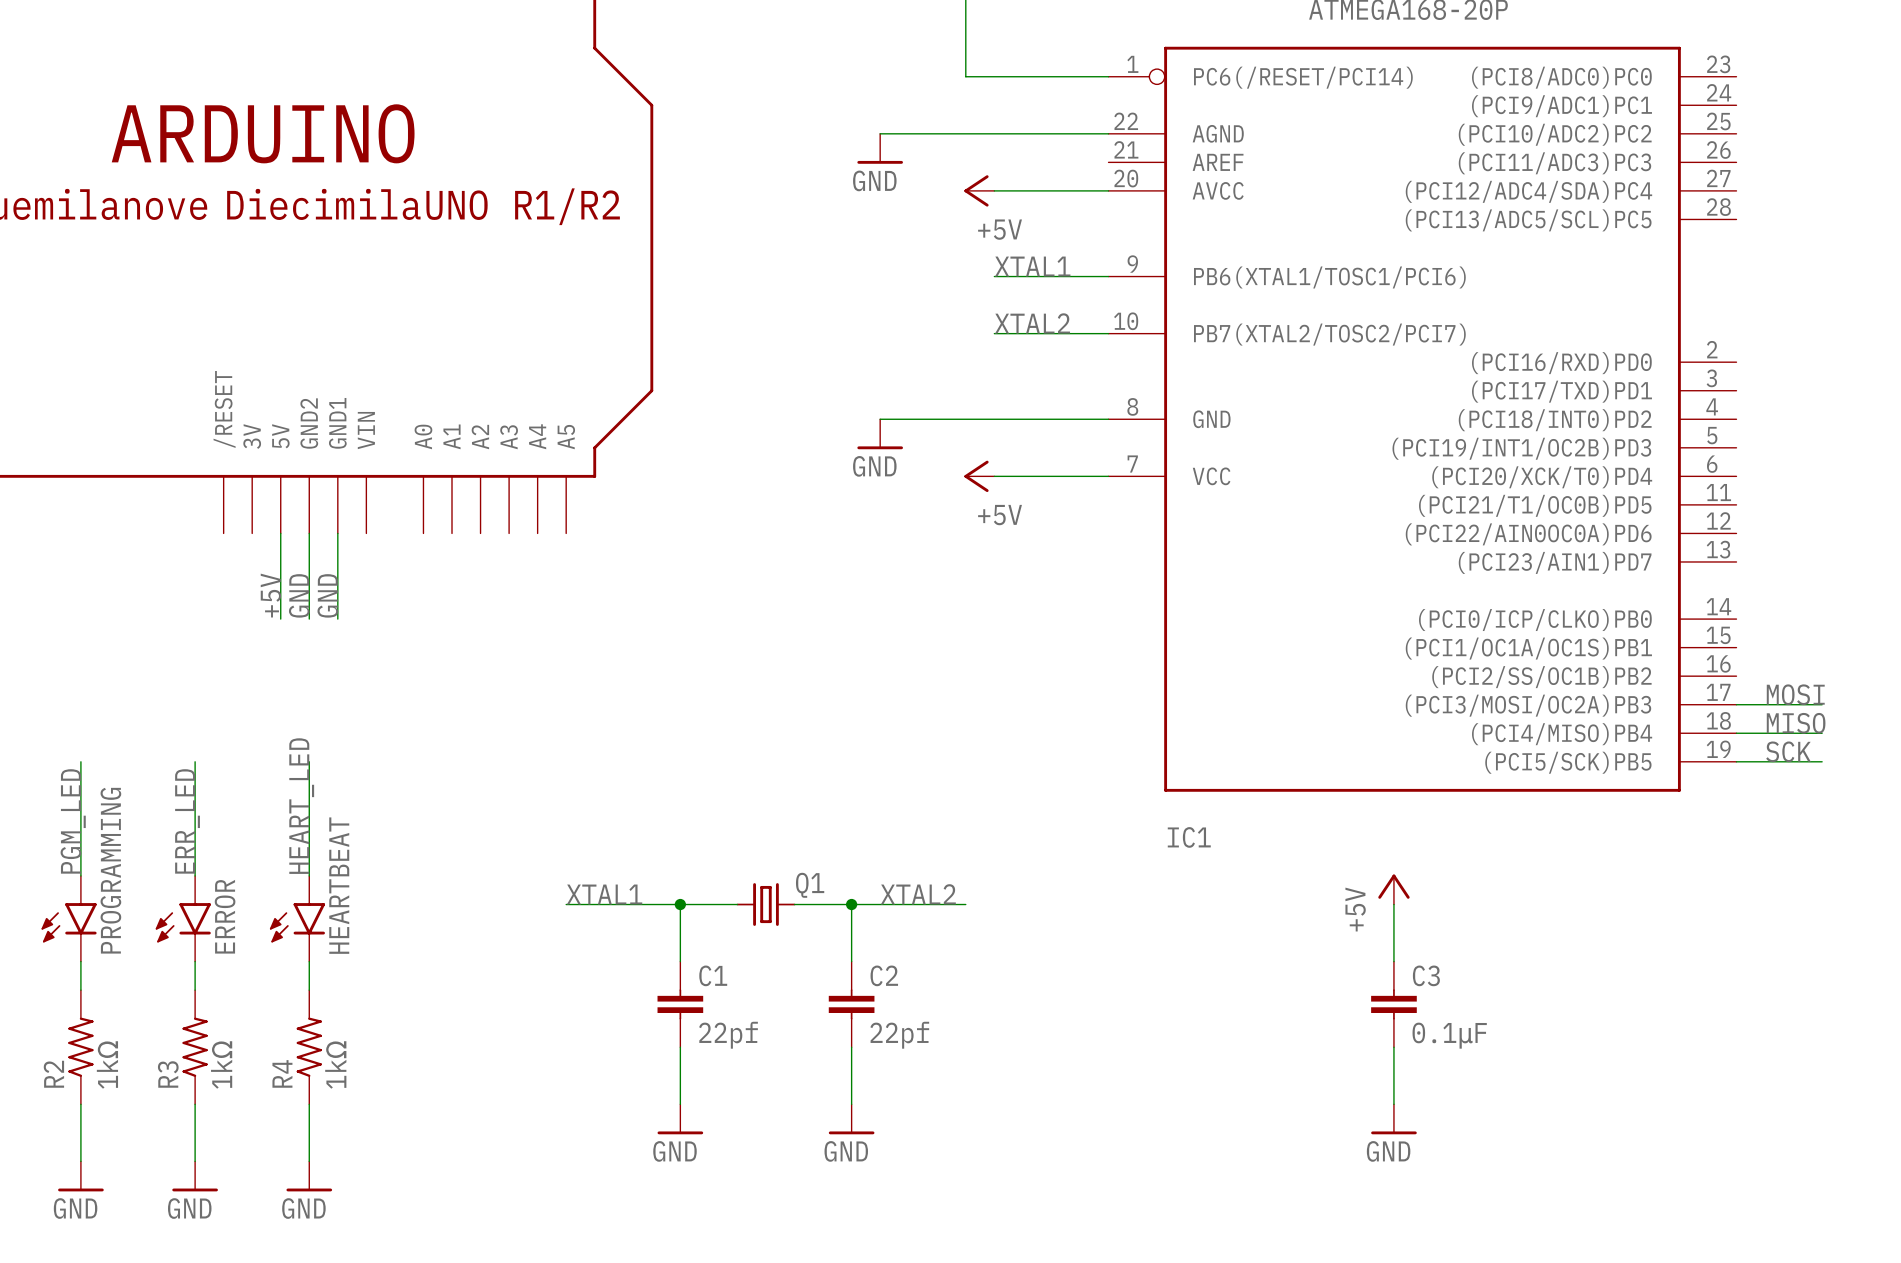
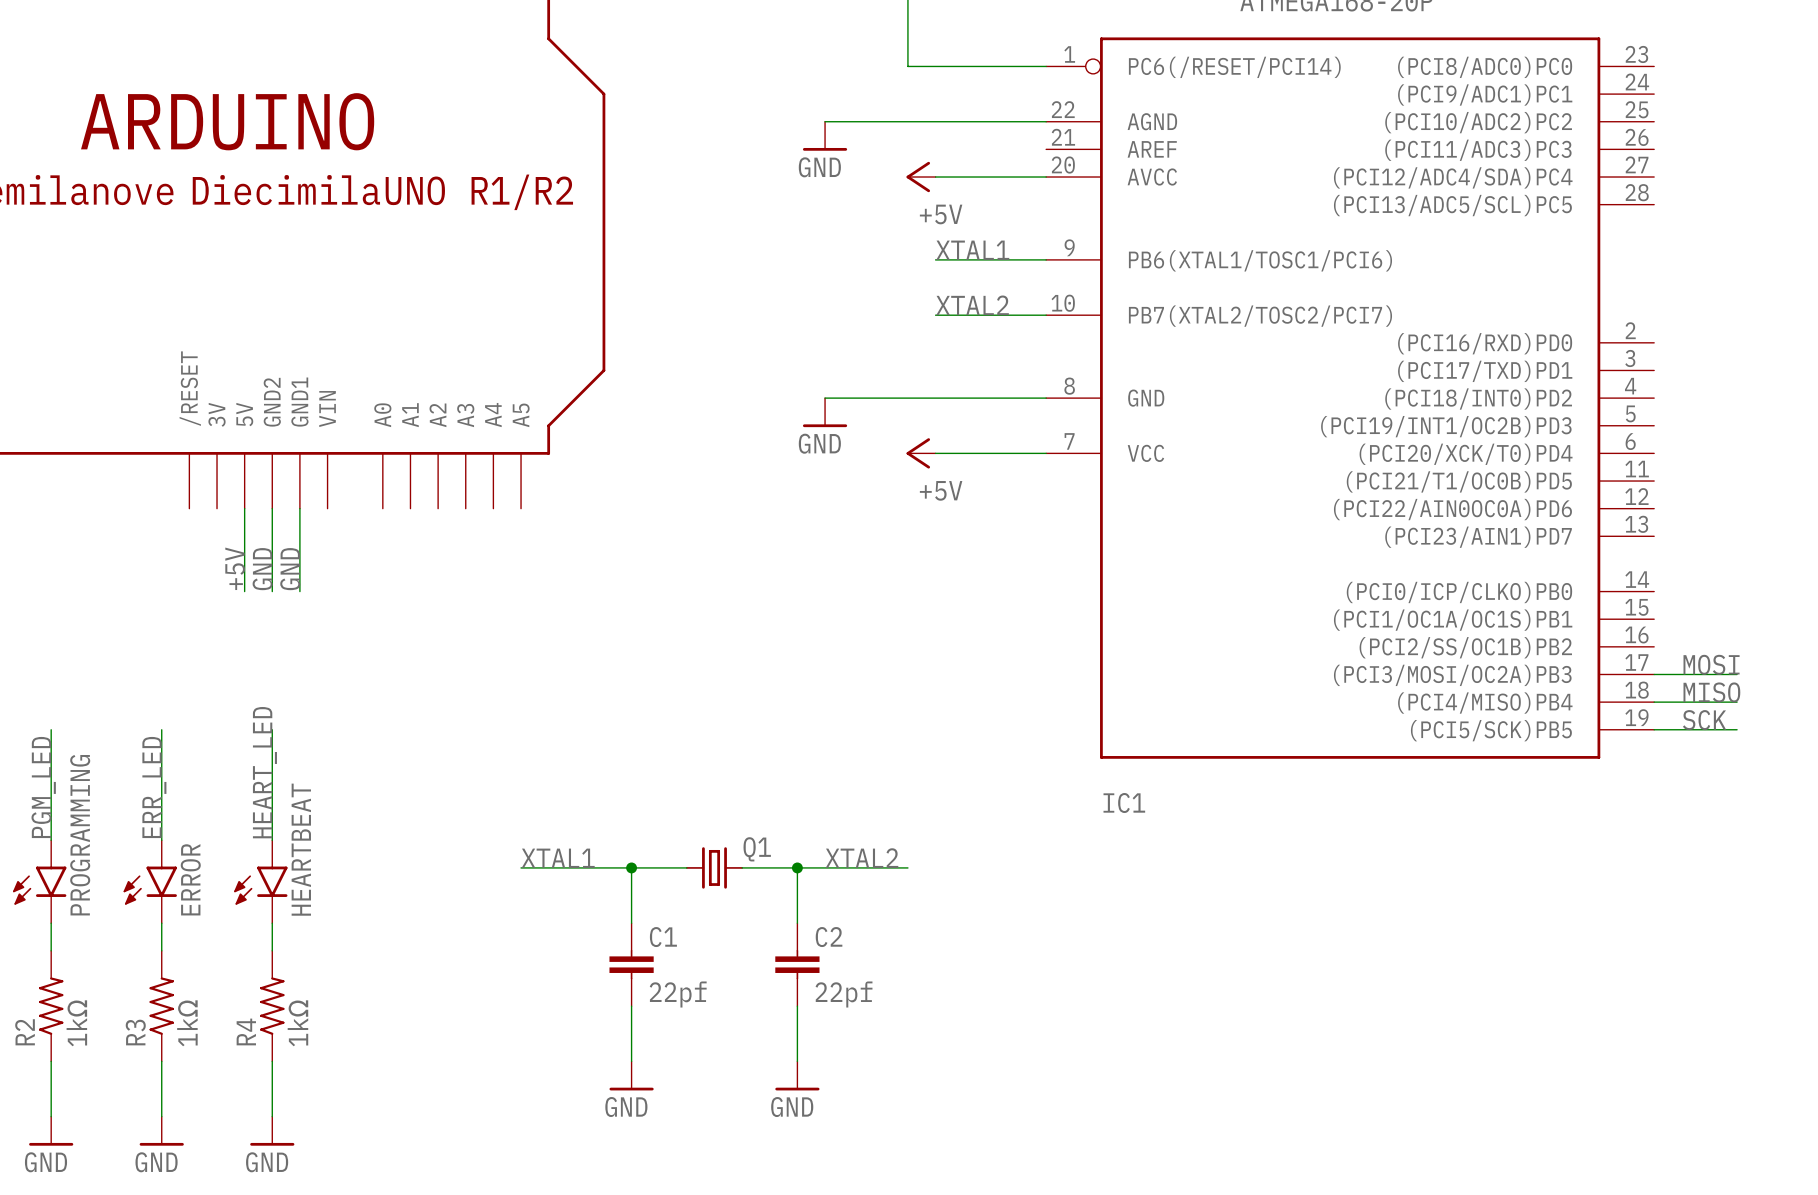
power symbol: +5V (1393, 889) -> none
wire: (1393, 904) (1393, 961) -> none
C3: 0.1μF (1393, 1004) -> none
wire: (1393, 1047) (1393, 1104) -> none
power symbol: GND (1393, 1119) -> none

